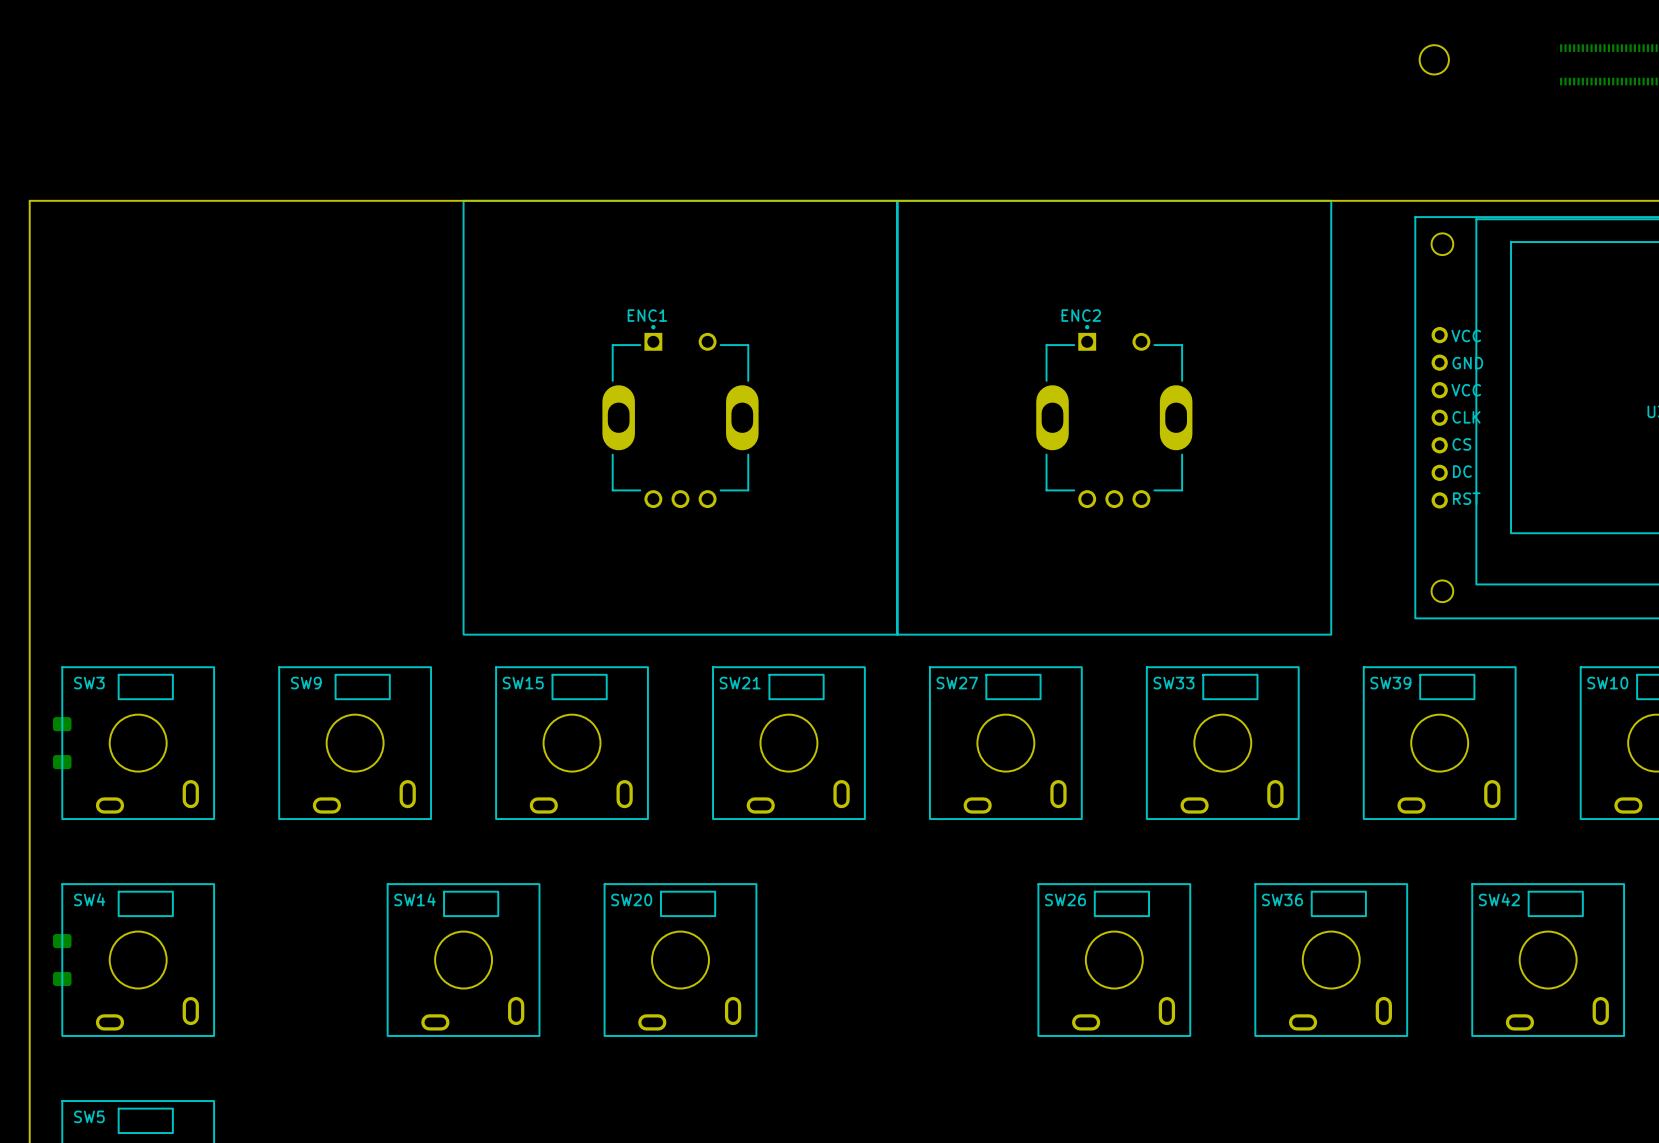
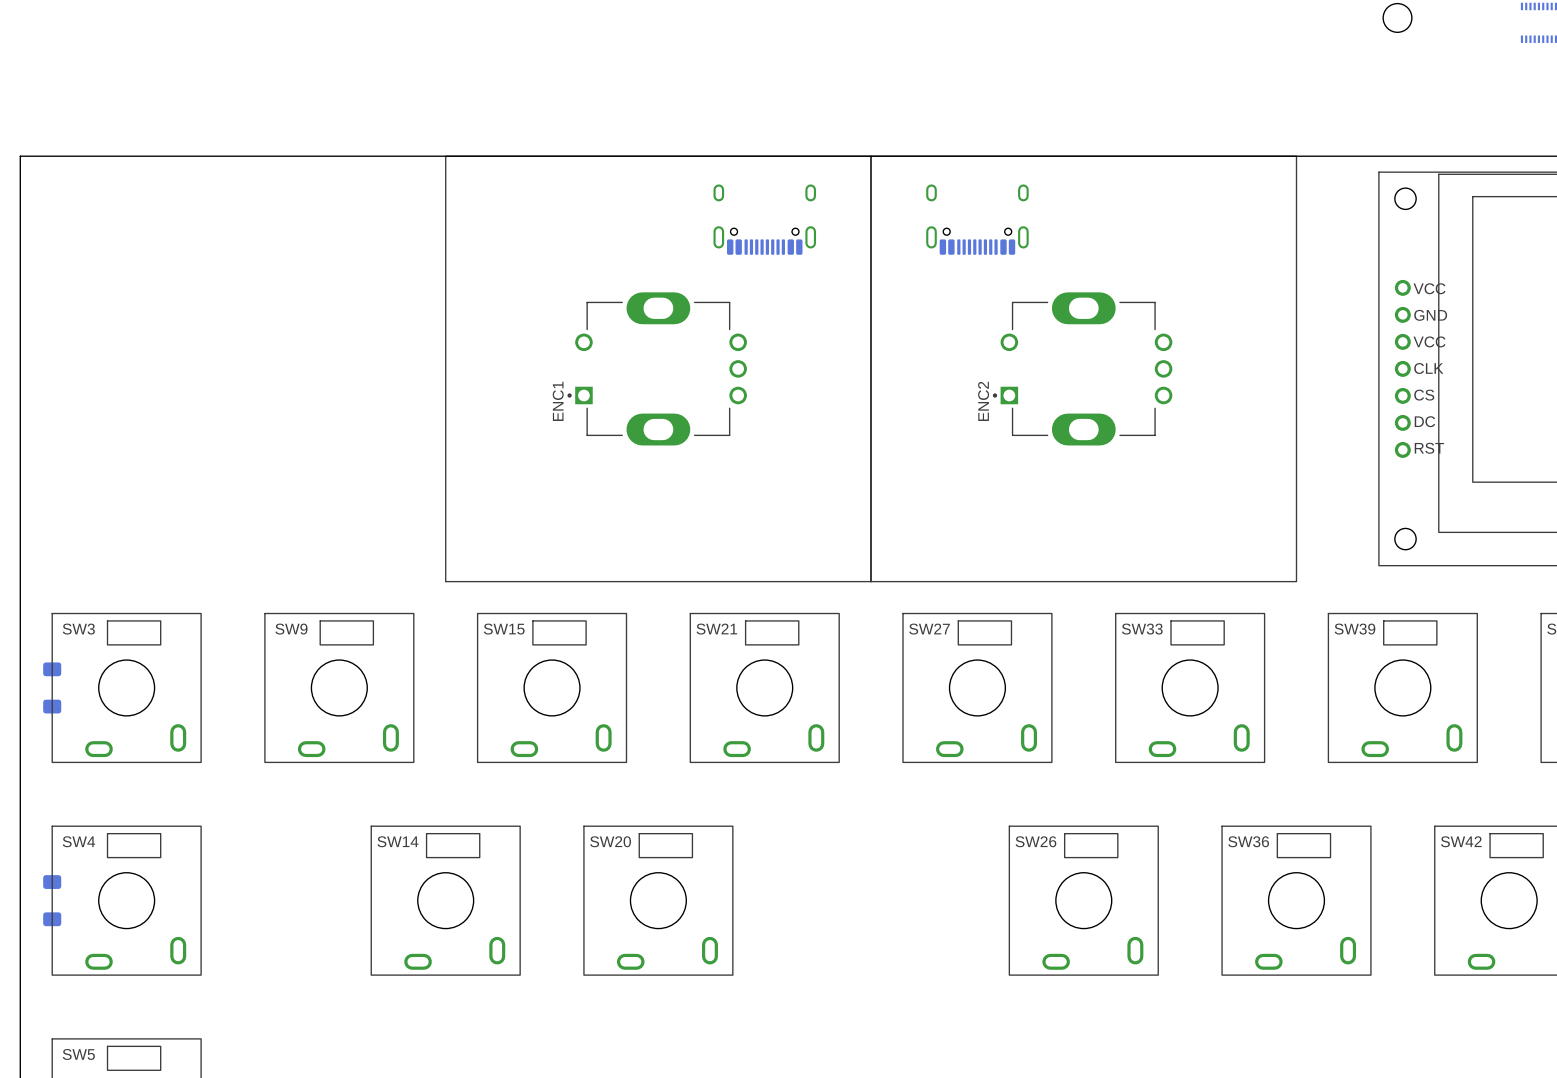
part: none -> (764, 219)
part: none -> (977, 219)
ENC1 rotation: 0° (680, 417) -> 90° counterclockwise (658, 368)
ENC2 rotation: 0° (1114, 417) -> 90° counterclockwise (1083, 368)

